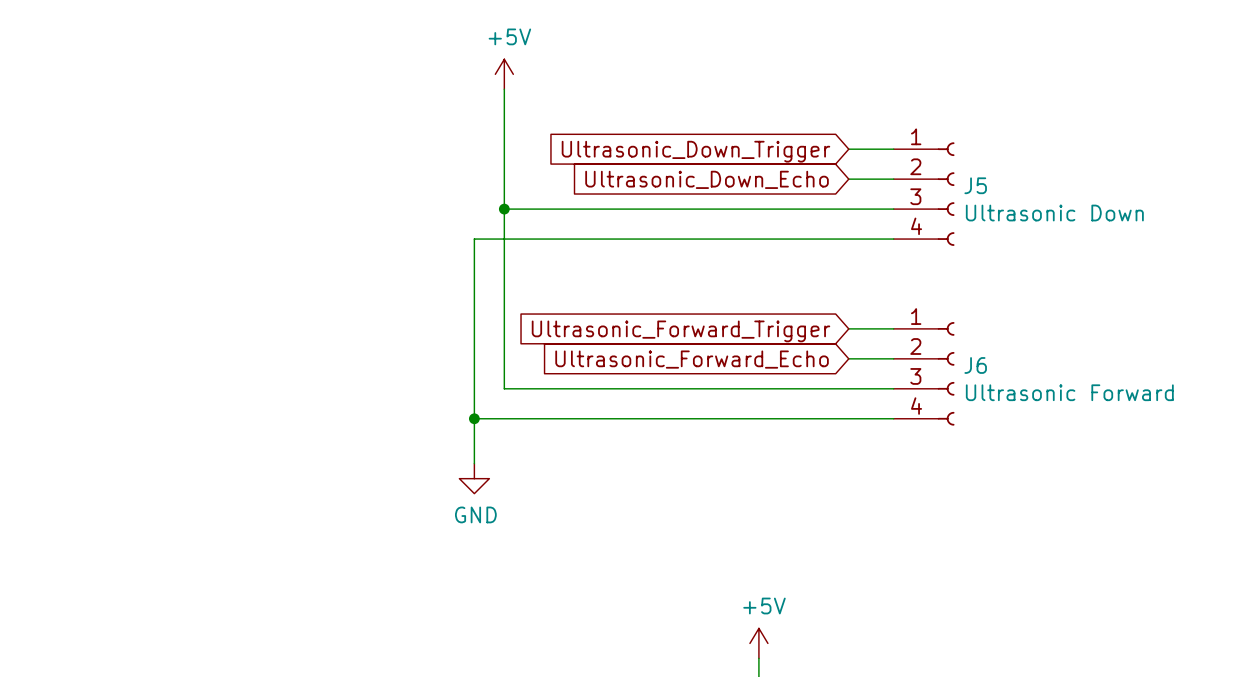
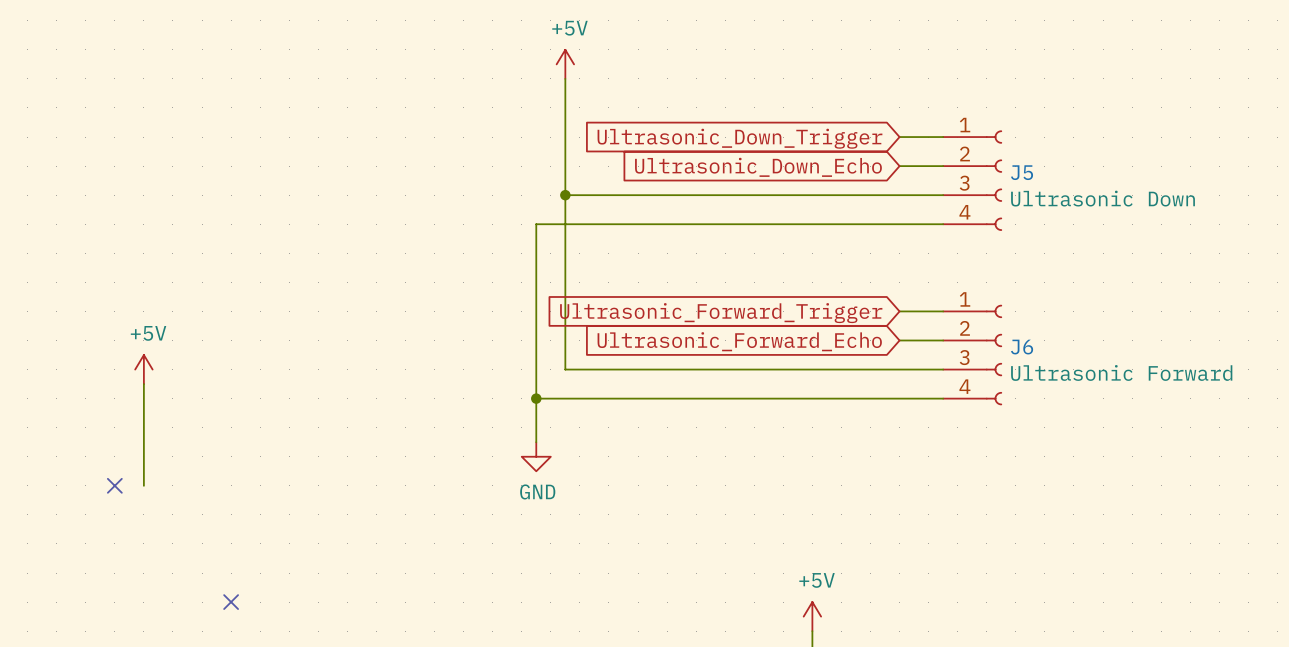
power symbol: none -> +5V (143, 369)
wire: none -> (143, 384) (143, 485)
no-connect mark: none -> (114, 485)
no-connect mark: none -> (231, 602)

